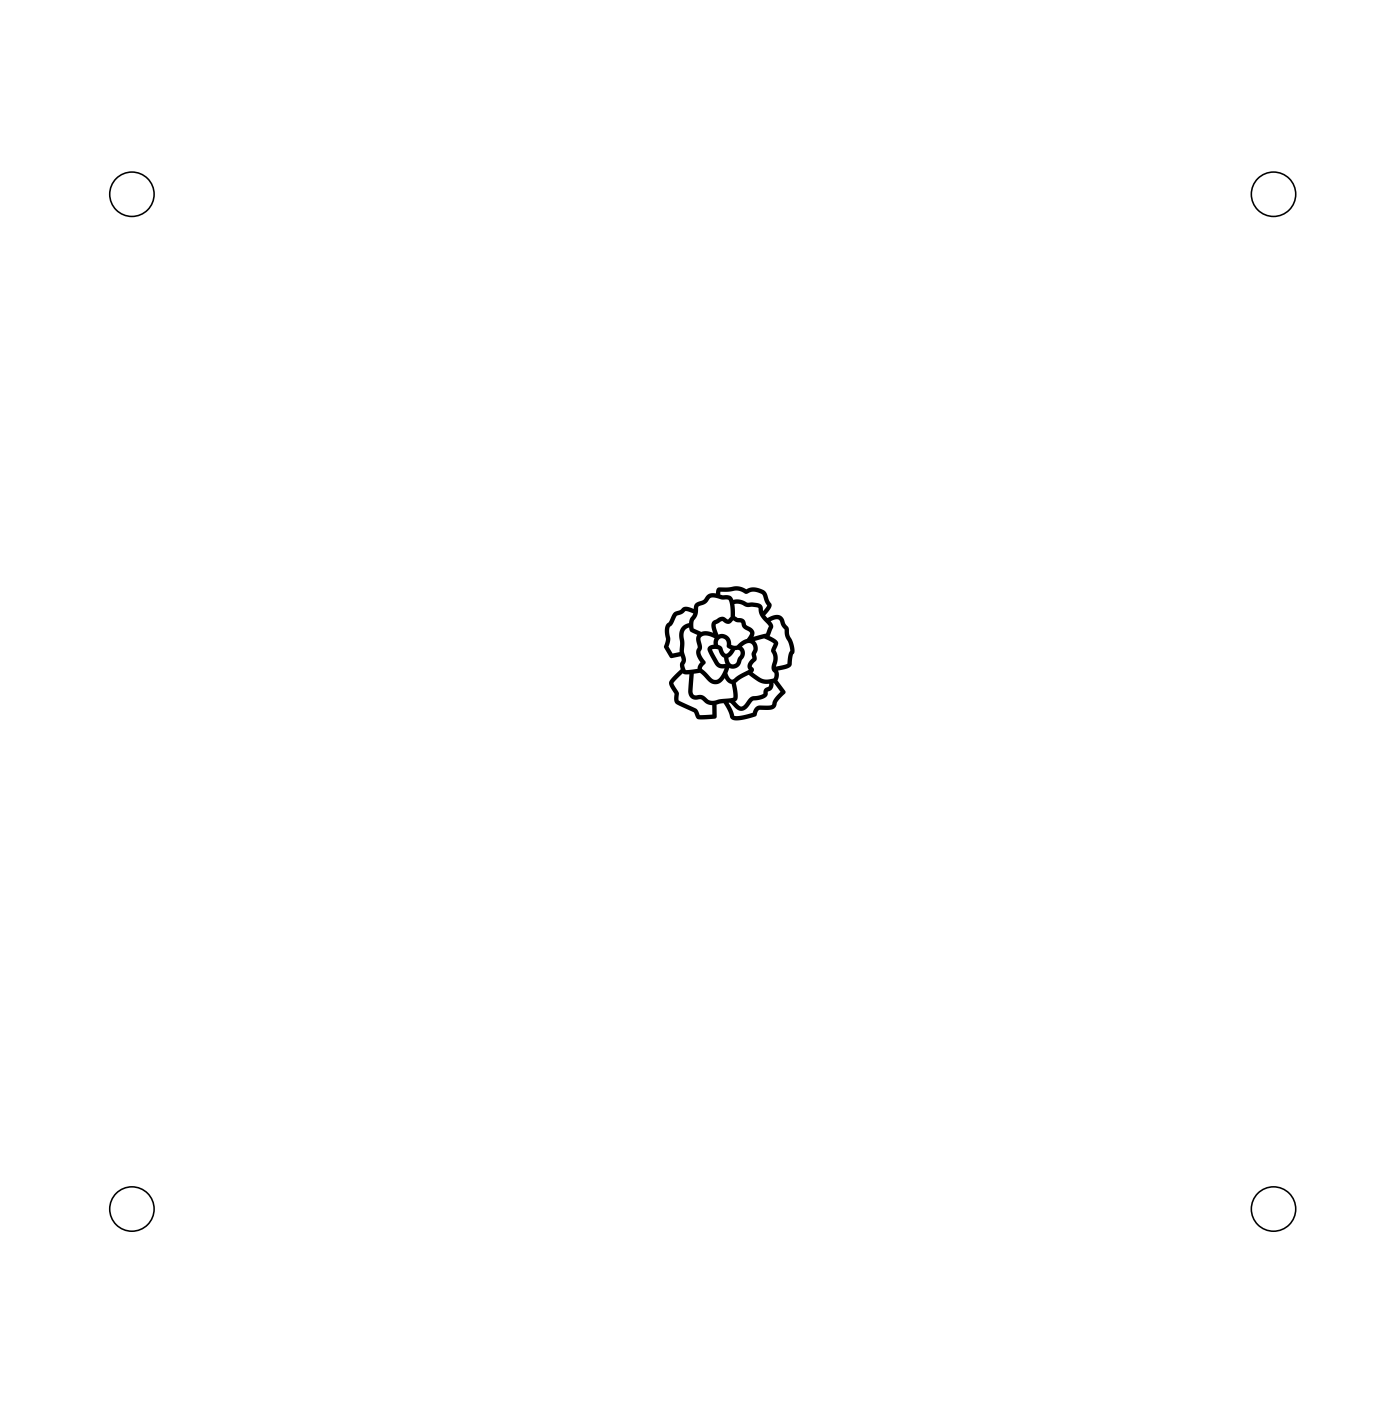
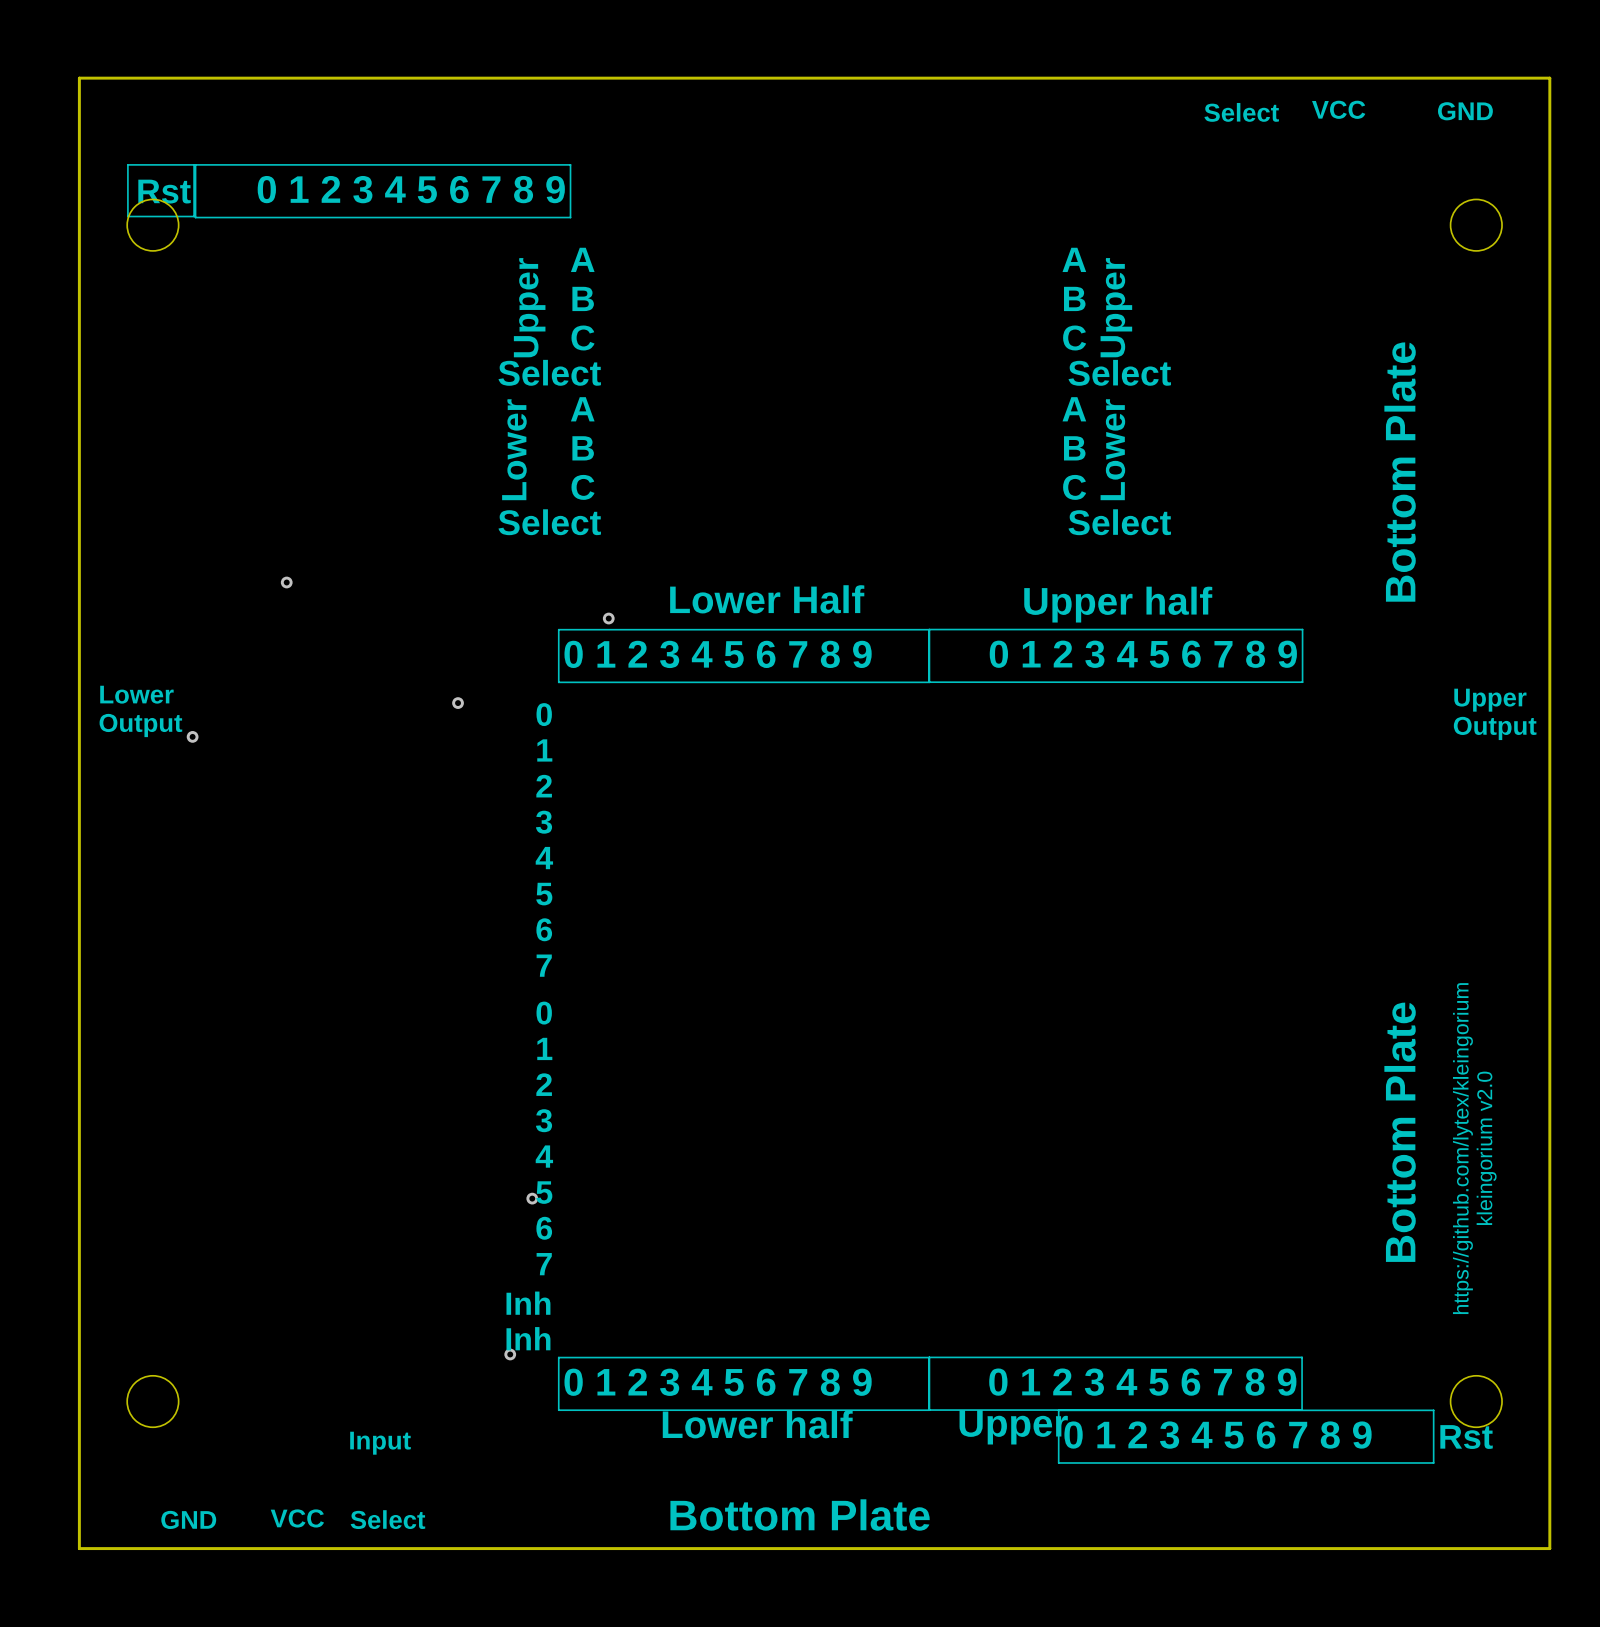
board edge: none -> (79, 78) (1549, 78) (1549, 1548) (79, 1548) (79, 78)
text: none -> VCC (1338, 109)
text: none -> GND (1465, 111)
text: none -> Select (1241, 112)
line: none -> (127, 164) (194, 164) (194, 216) (127, 216) (127, 164)
line: none -> (195, 164) (570, 164) (570, 217) (195, 217) (195, 164)
text: none -> 0 1 2 3 4 5 6 7 8 9 (411, 189)
text: none -> Rst (164, 191)
text: none -> A (582, 259)
text: none -> A (1074, 259)
text: none -> B (583, 298)
text: none -> B (1074, 298)
text: none -> Upper (529, 307)
text: none -> Upper (1116, 307)
text: none -> C (583, 338)
text: none -> C (1074, 338)
text: none -> Select (549, 372)
text: none -> Select (1119, 372)
text: none -> A (582, 409)
text: none -> A (1074, 409)
text: none -> B (583, 448)
text: none -> B (1074, 448)
text: none -> Lower (514, 449)
text: none -> Lower (1112, 449)
text: none -> Bottom Plate (1400, 472)
text: none -> C (583, 487)
text: none -> C (1074, 487)
text: none -> Select (549, 522)
text: none -> Select (1119, 522)
via: none -> (286, 582)
text: none -> Lower Half (767, 599)
text: none -> Upper half (1118, 604)
via: none -> (608, 618)
line: none -> (929, 629) (558, 629) (558, 682) (929, 682) (929, 629) (1302, 629) (1302, 682) (929, 682)
text: none -> 0 1 2 3 4 5 6 7 8 9 (718, 654)
text: none -> 0 1 2 3 4 5 6 7 8 9 (1143, 654)
drawing: [663, 586, 795, 721] -> none
text: none -> Lower (136, 694)
text: none -> Upper (1490, 700)
via: none -> (458, 703)
text: none -> 0 (544, 714)
text: none -> Output (140, 725)
text: none -> Output (1495, 728)
via: none -> (192, 736)
text: none -> 1 (544, 750)
text: none -> 2 (544, 786)
text: none -> 3 (544, 822)
text: none -> 4 (544, 858)
text: none -> 5 (544, 894)
text: none -> 6 (544, 929)
text: none -> 7 (544, 965)
text: none -> 0 (544, 1013)
text: none -> 1 (544, 1048)
text: none -> 2 (544, 1084)
text: none -> Bottom Plate (1400, 1132)
text: none -> 3 (544, 1120)
text: none -> https://github.com/lytex/kleingorium (1462, 1148)
text: none -> kleingorium v2.0 (1486, 1148)
text: none -> 4 (544, 1156)
text: none -> 5 (544, 1192)
via: none -> (532, 1198)
text: none -> 6 (544, 1228)
text: none -> 7 (544, 1264)
text: none -> Inh (528, 1303)
text: none -> Inh (528, 1338)
via: none -> (510, 1354)
line: none -> (929, 1357) (558, 1357) (558, 1410) (929, 1410) (929, 1357) (1302, 1357) (1302, 1410) (929, 1410)
text: none -> 0 1 2 3 4 5 6 7 8 9 (718, 1382)
text: none -> 0 1 2 3 4 5 6 7 8 9 (1142, 1382)
line: none -> (1058, 1410) (1433, 1410) (1433, 1462) (1058, 1462) (1058, 1410)
text: none -> Lower half (757, 1424)
text: none -> Upper (1013, 1427)
text: none -> 0 1 2 3 4 5 6 7 8 9 (1218, 1435)
text: none -> Rst (1466, 1437)
text: none -> Input (380, 1443)
text: none -> Bottom Plate (800, 1514)
text: none -> VCC (297, 1518)
text: none -> GND (188, 1519)
text: none -> Select (387, 1519)

